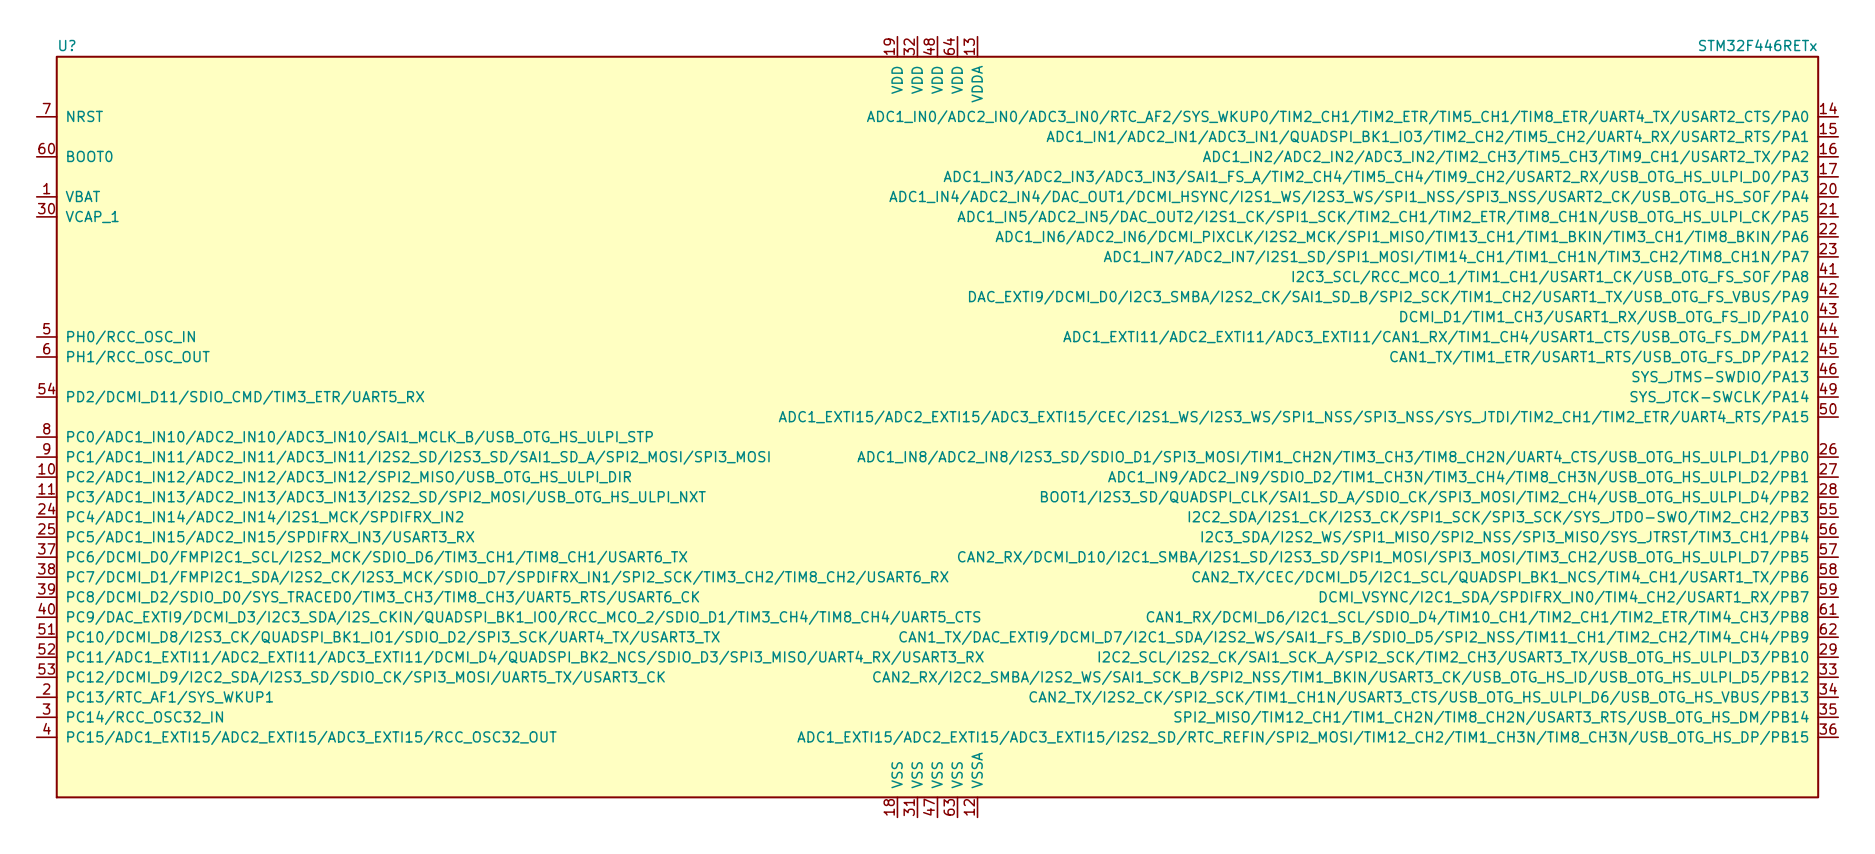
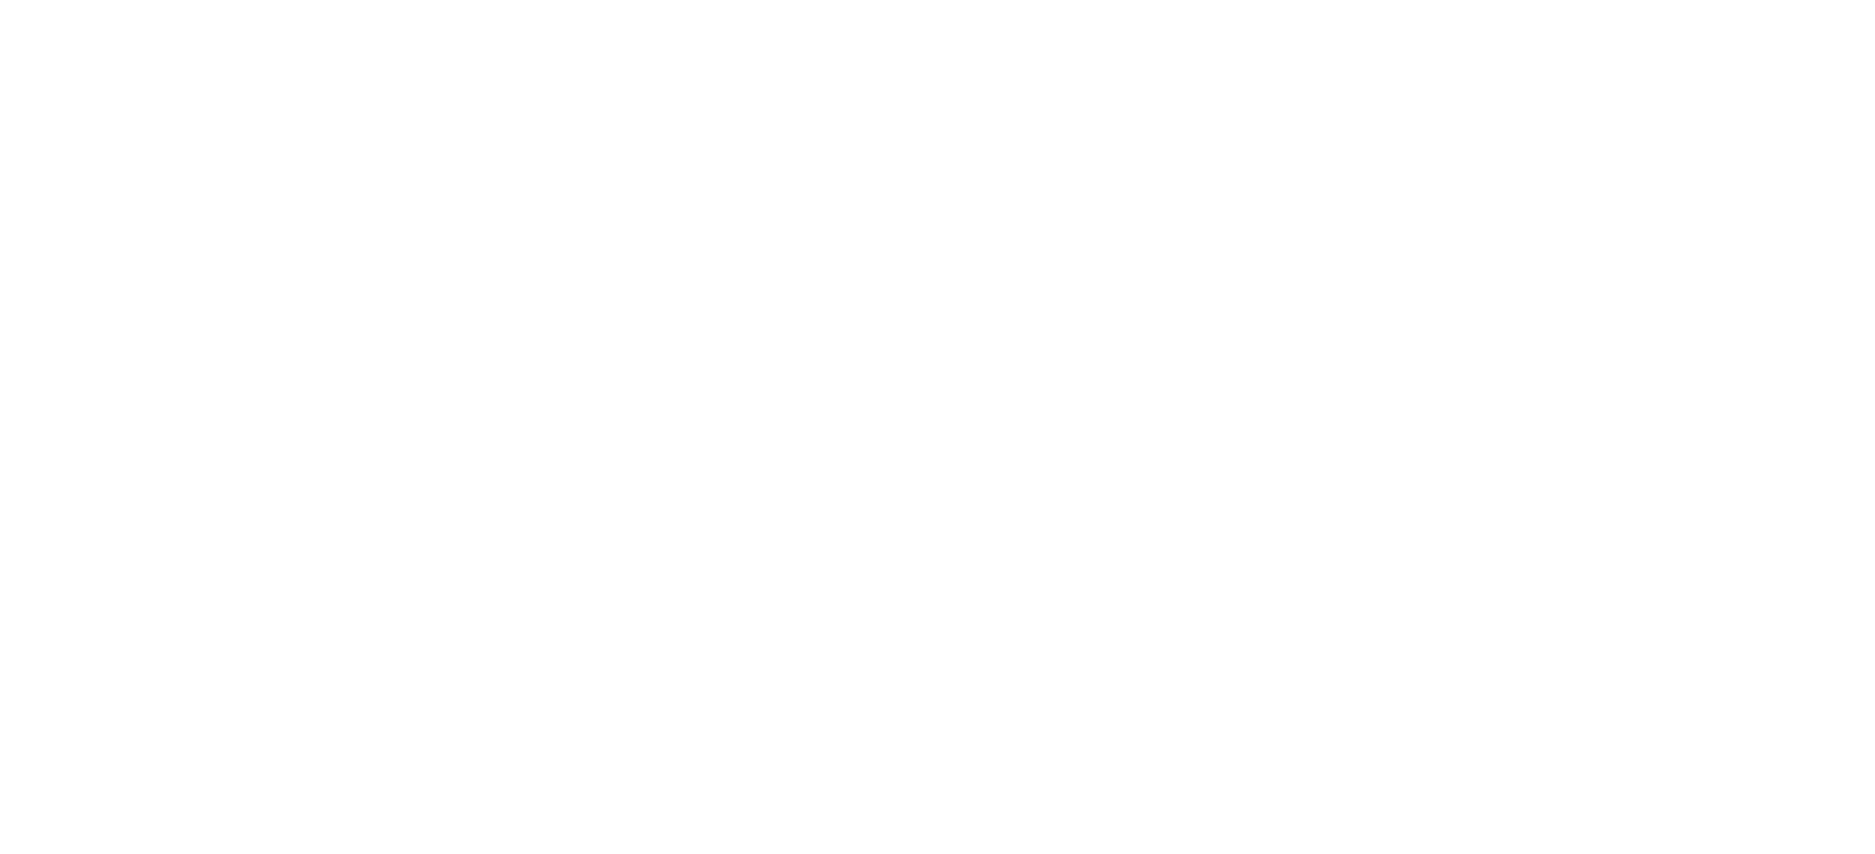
U?: STM32F446RETx (937, 427) -> none

